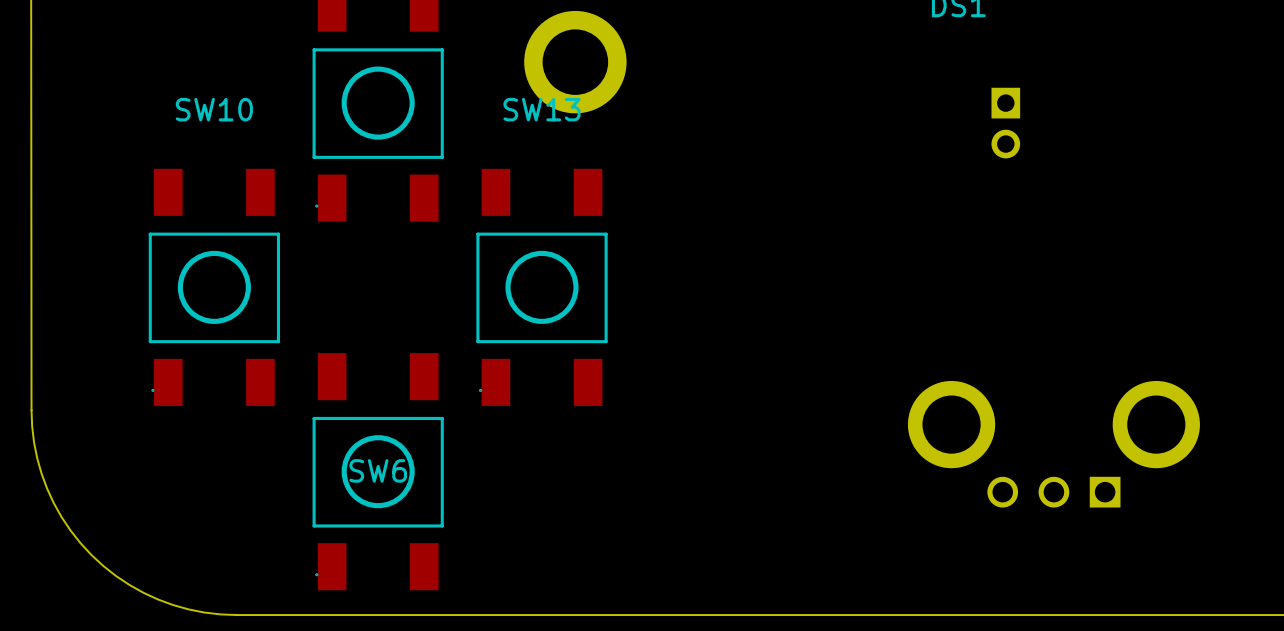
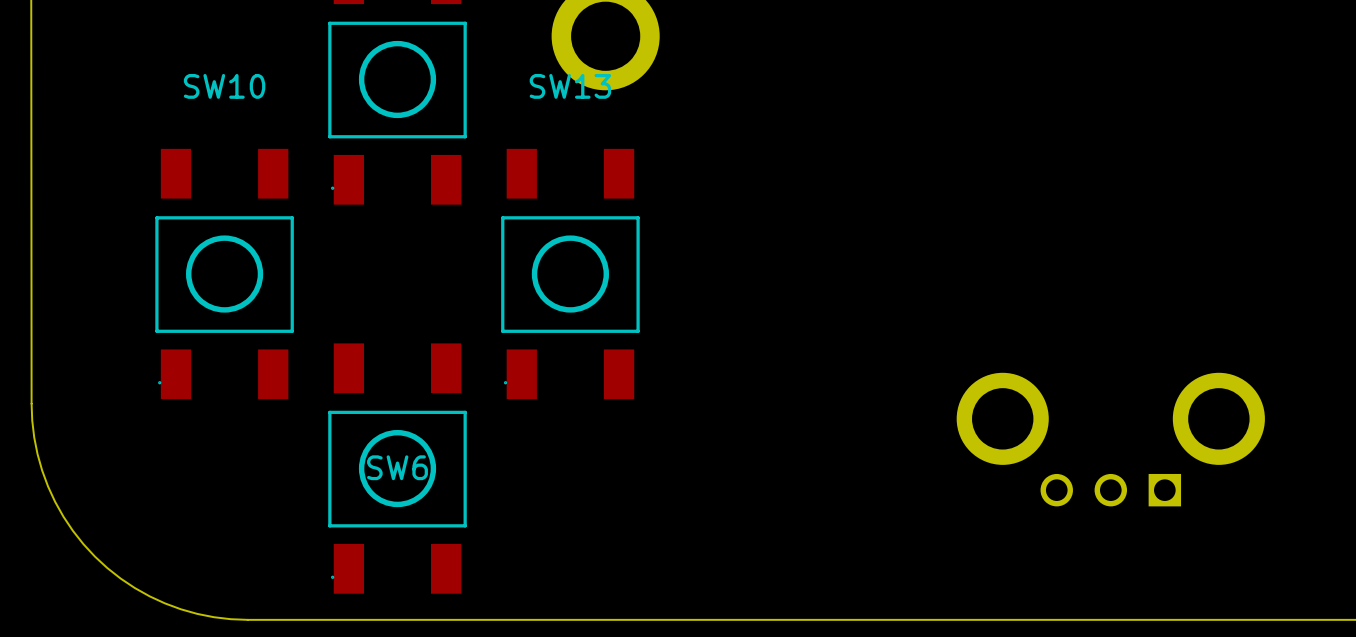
part: (1005, 123) -> none

